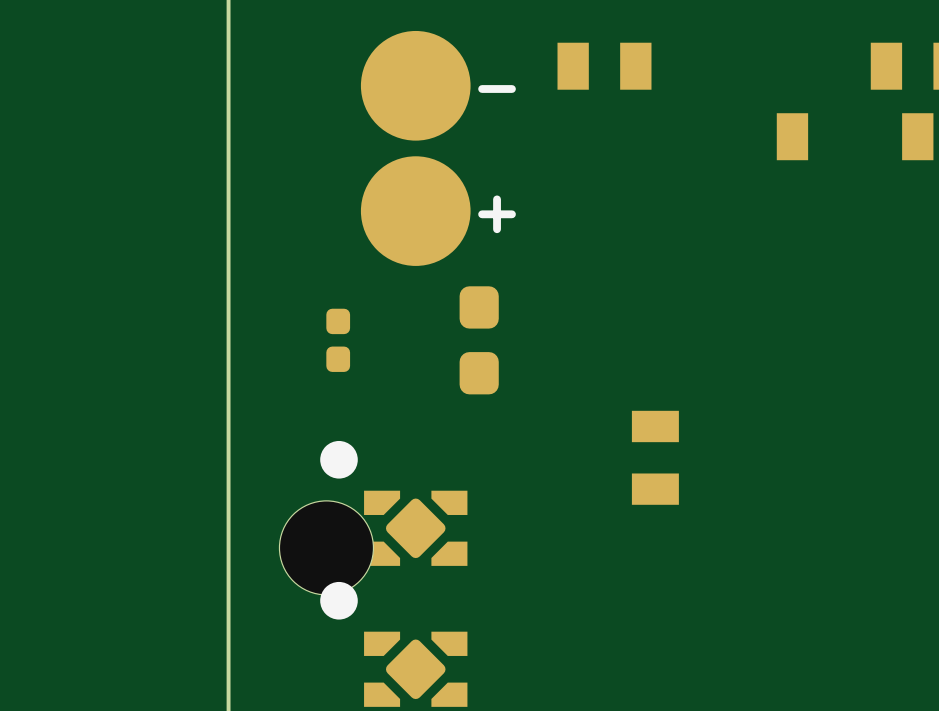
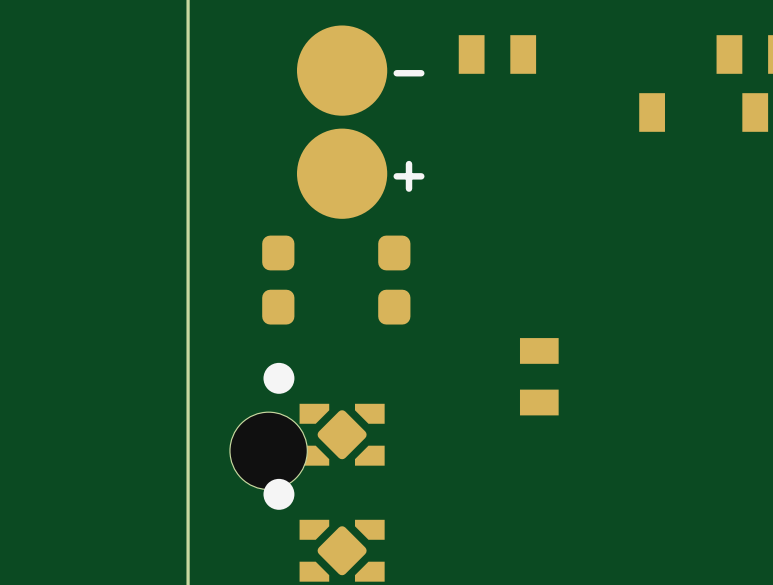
part footprint: [326, 308, 351, 372] -> [262, 235, 295, 325]

